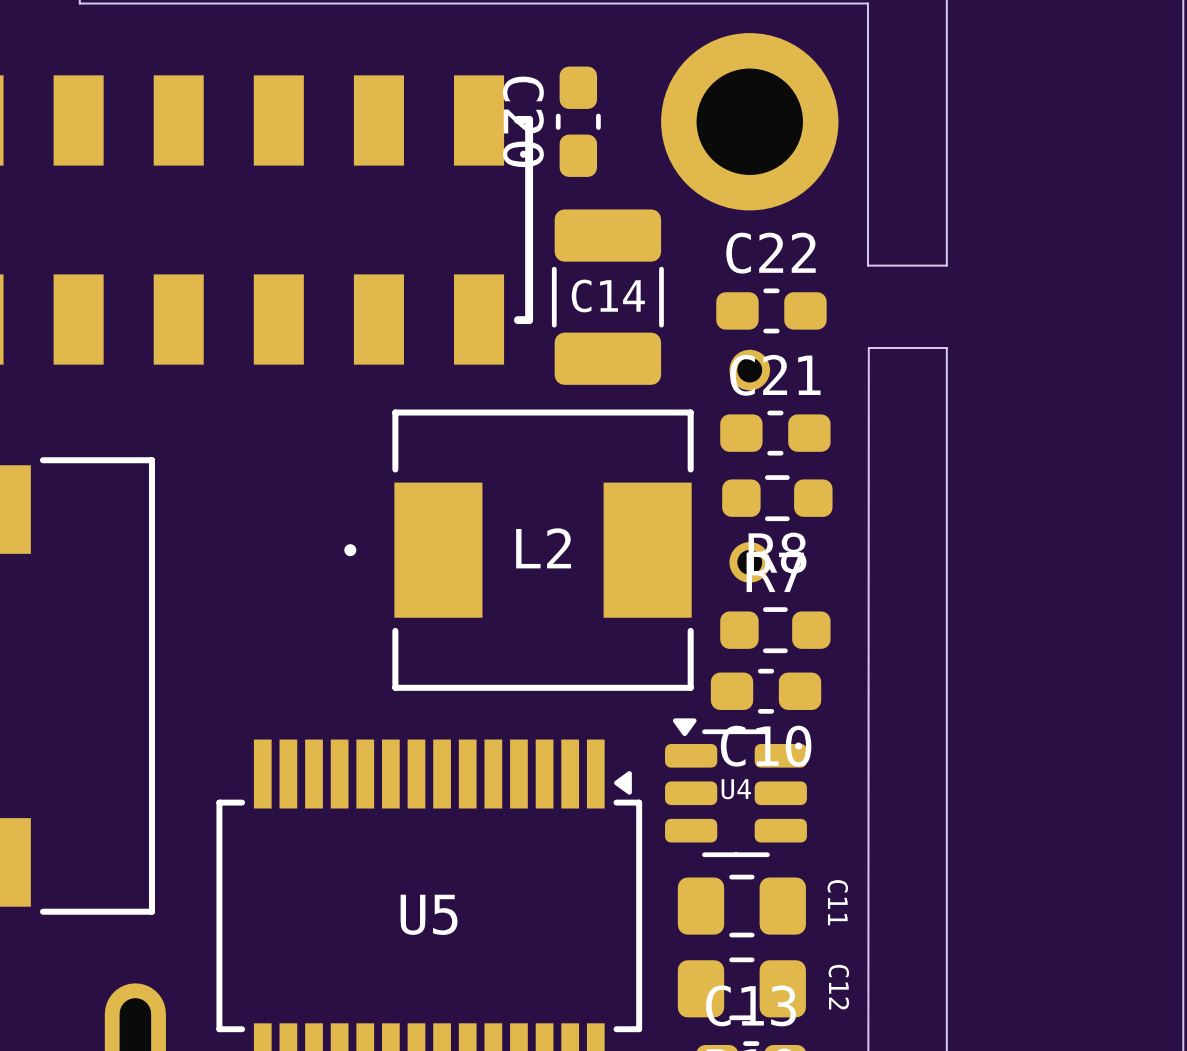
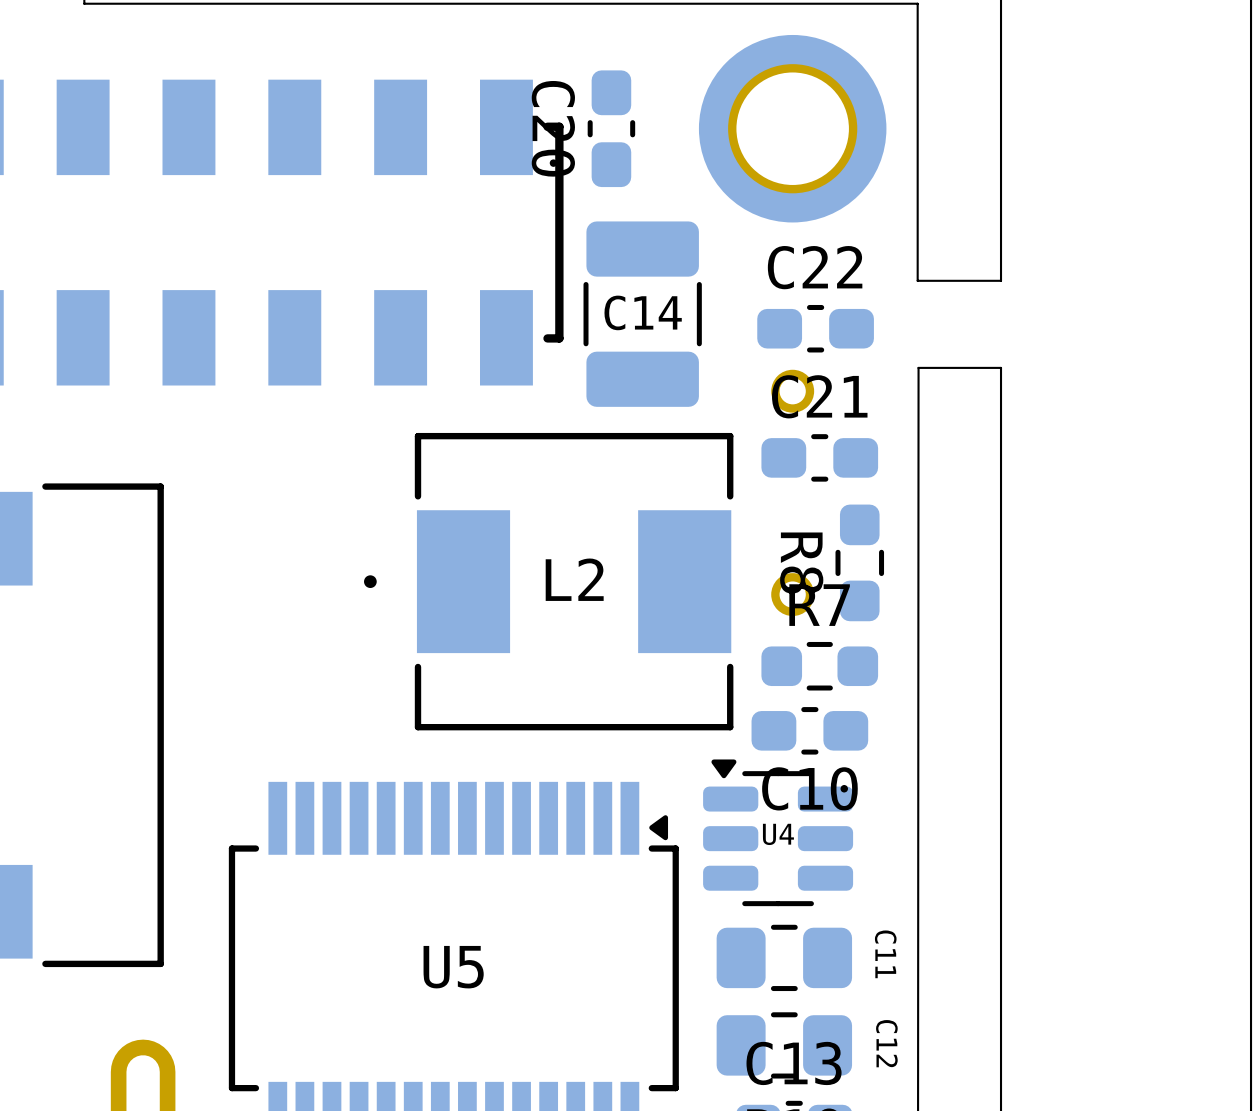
R8 rotation: 0° (777, 498) -> 90° clockwise (859, 562)

